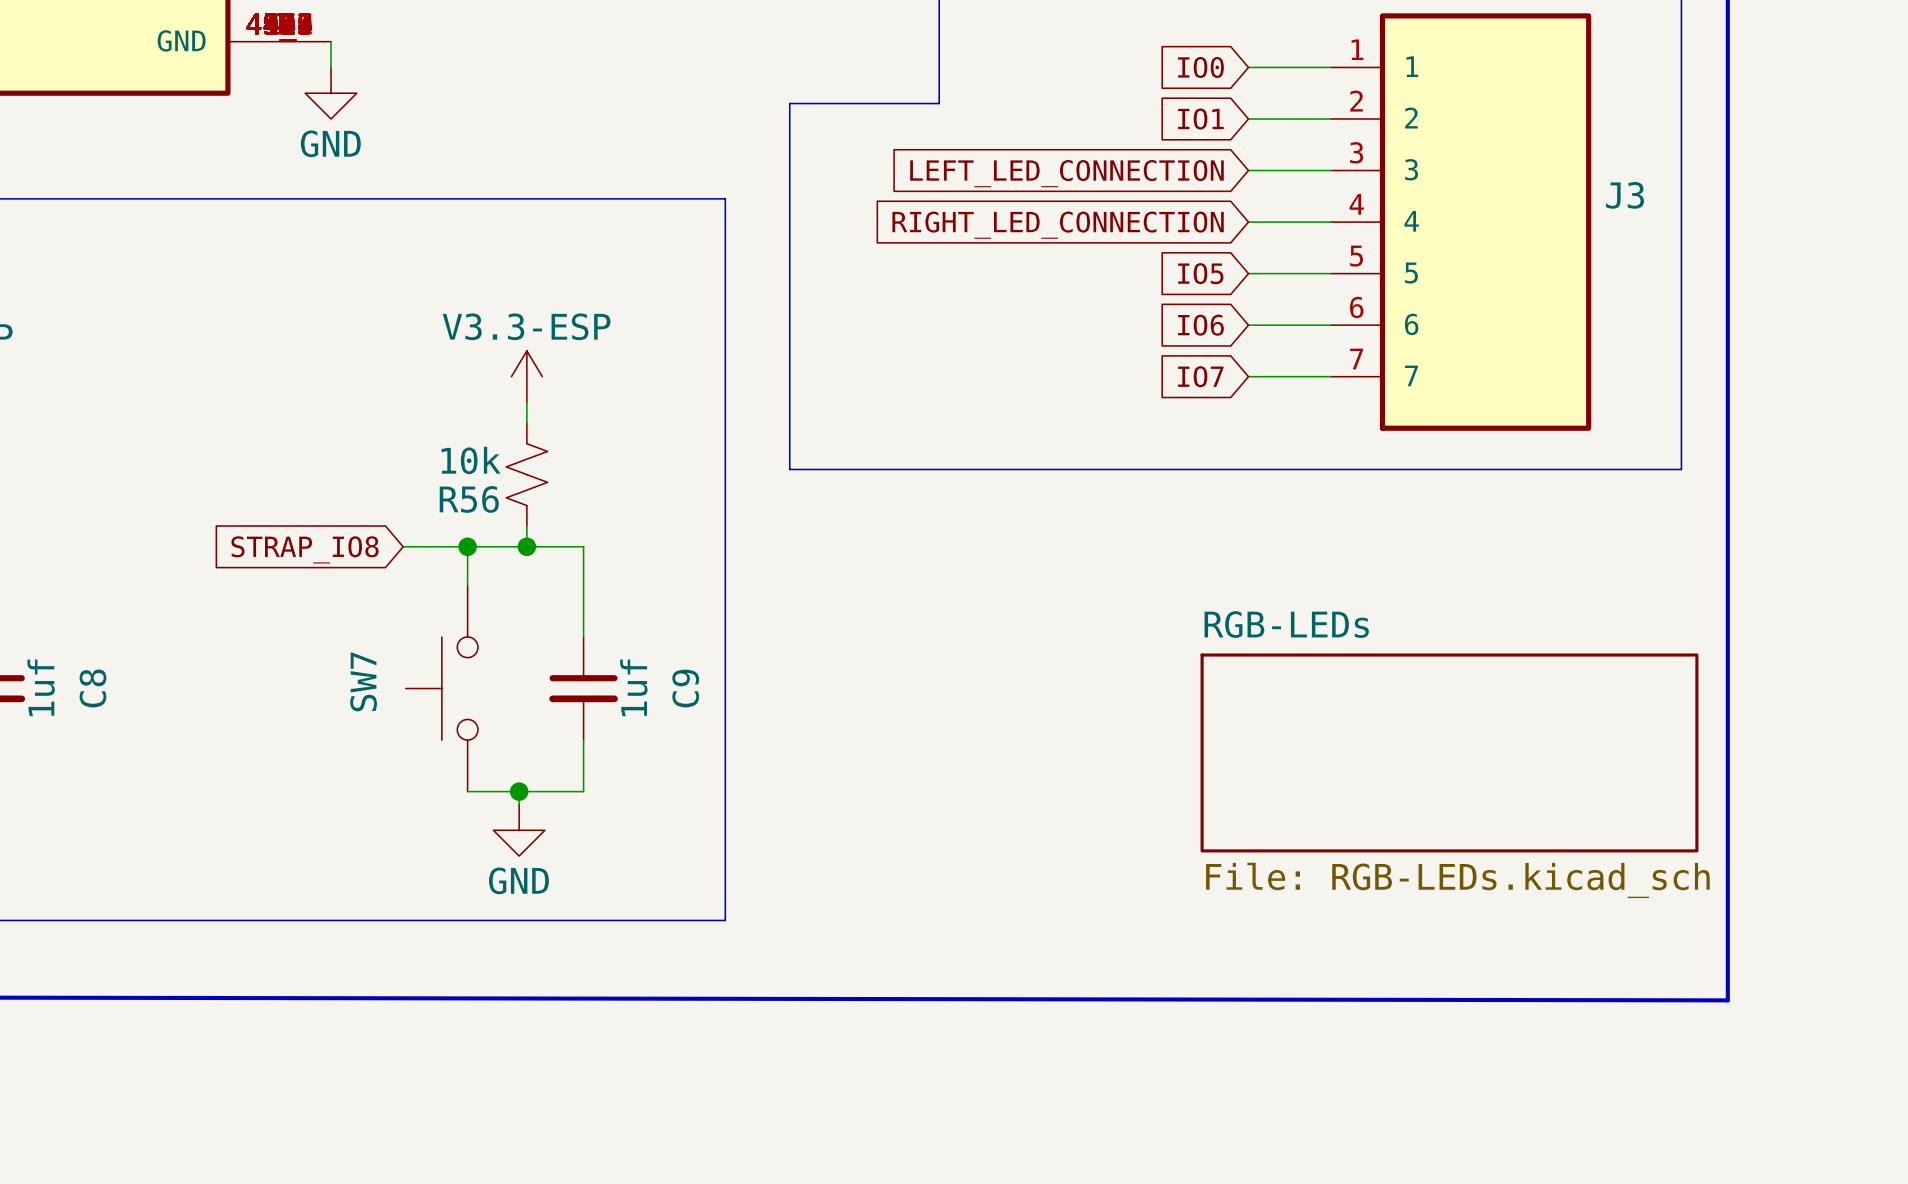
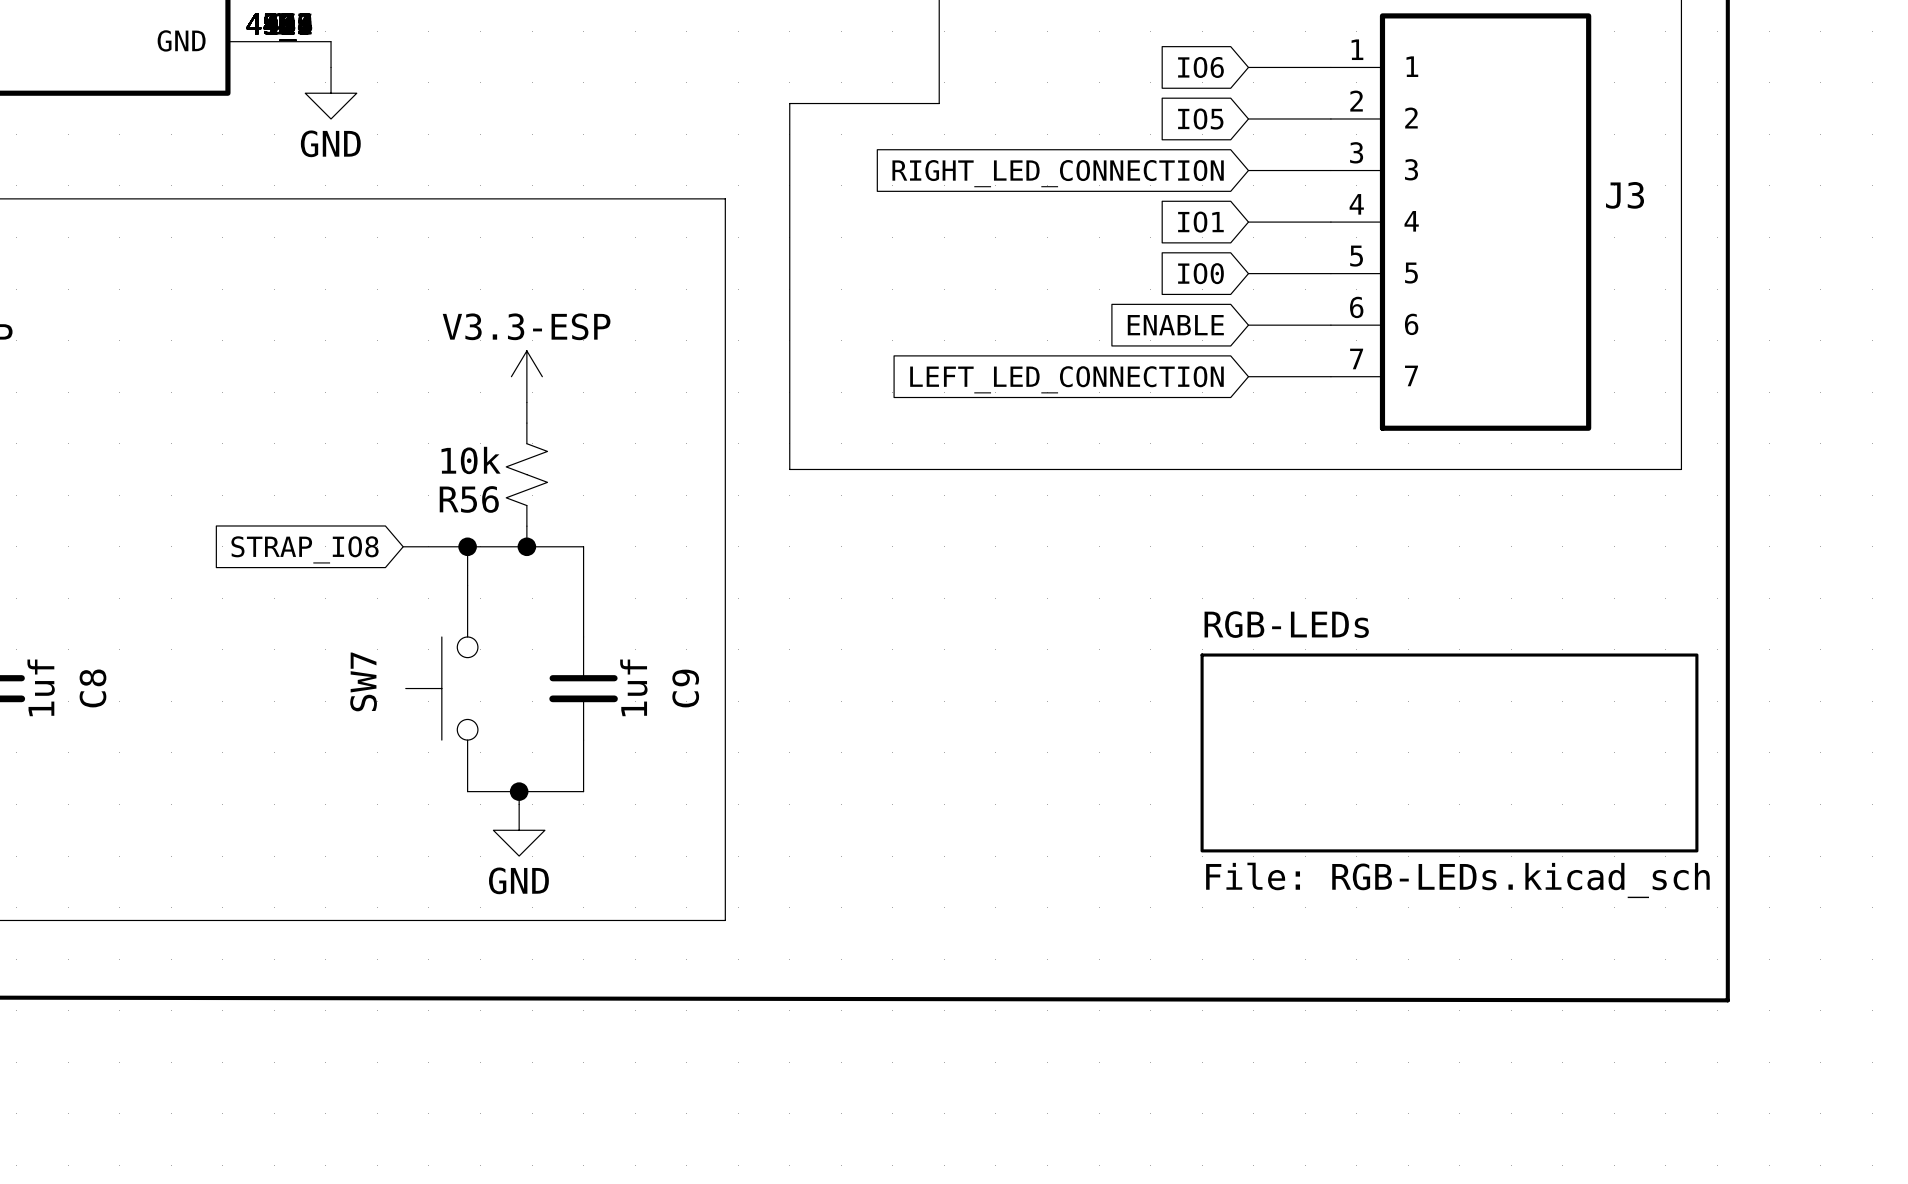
global label: IO0 (1200, 67) -> IO6 (1200, 67)
global label: IO1 (1200, 119) -> IO5 (1200, 119)
global label: LEFT_LED_CONNECTION (1066, 173) -> RIGHT_LED_CONNECTION (1058, 173)
global label: RIGHT_LED_CONNECTION (1058, 225) -> IO1 (1200, 222)
global label: IO5 (1200, 273) -> IO0 (1200, 273)
global label: IO6 (1200, 325) -> ENABLE (1175, 325)
global label: IO7 (1200, 376) -> LEFT_LED_CONNECTION (1066, 379)

